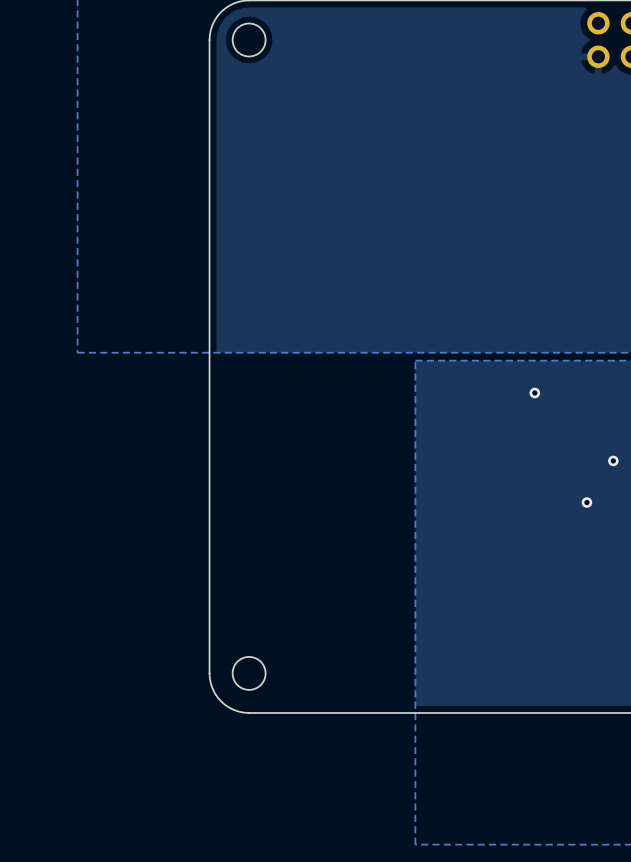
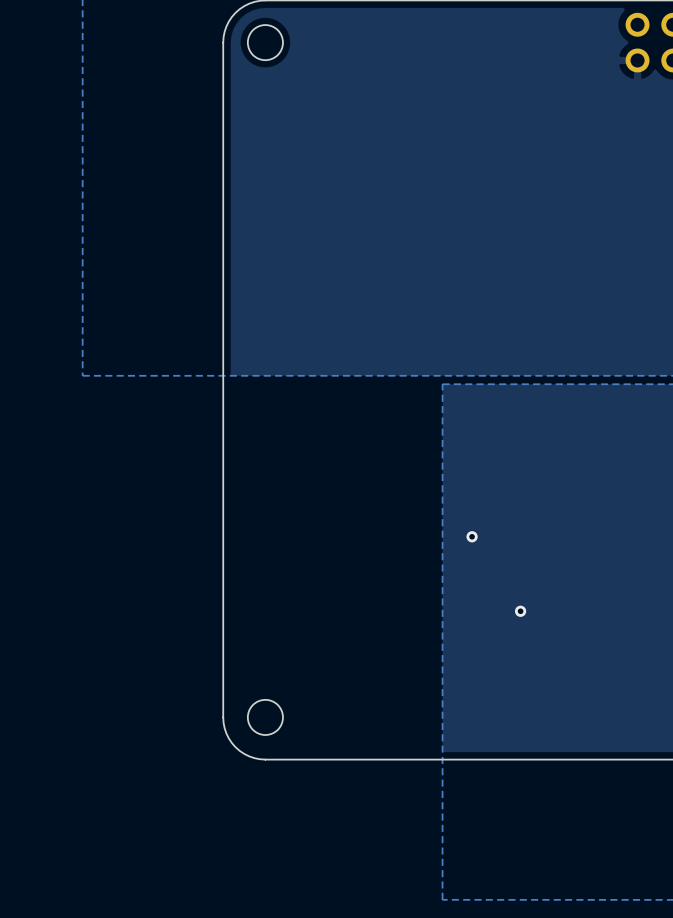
via: (534, 392) -> none
via: (613, 460) -> none
via: (586, 502) -> none
via: none -> (472, 536)
via: none -> (520, 611)

